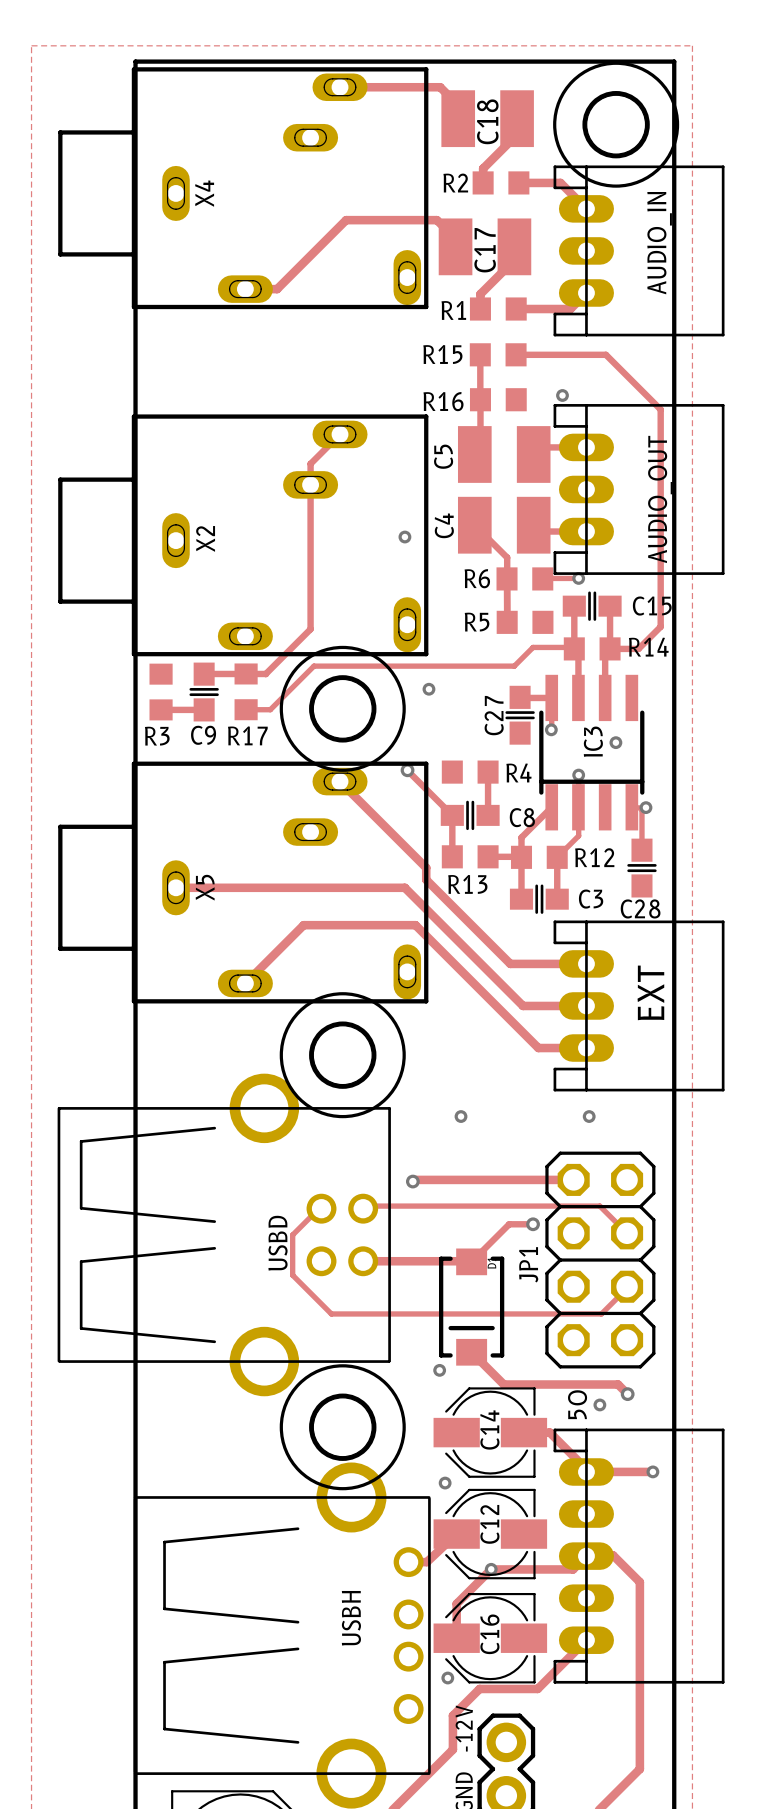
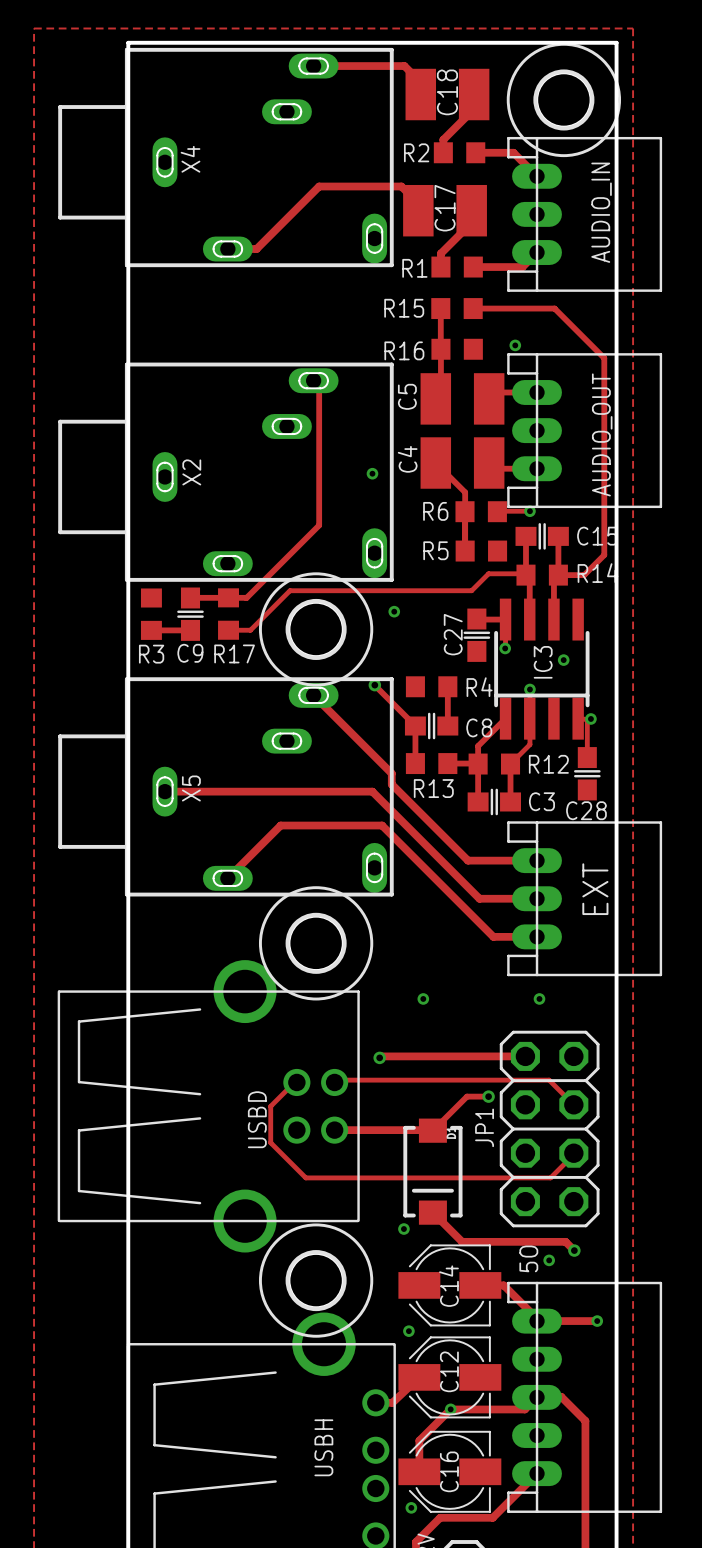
track: (340, 434) (310, 463) (310, 629) (265, 673) -> (313, 380) (319, 386) (319, 525) (246, 597)

